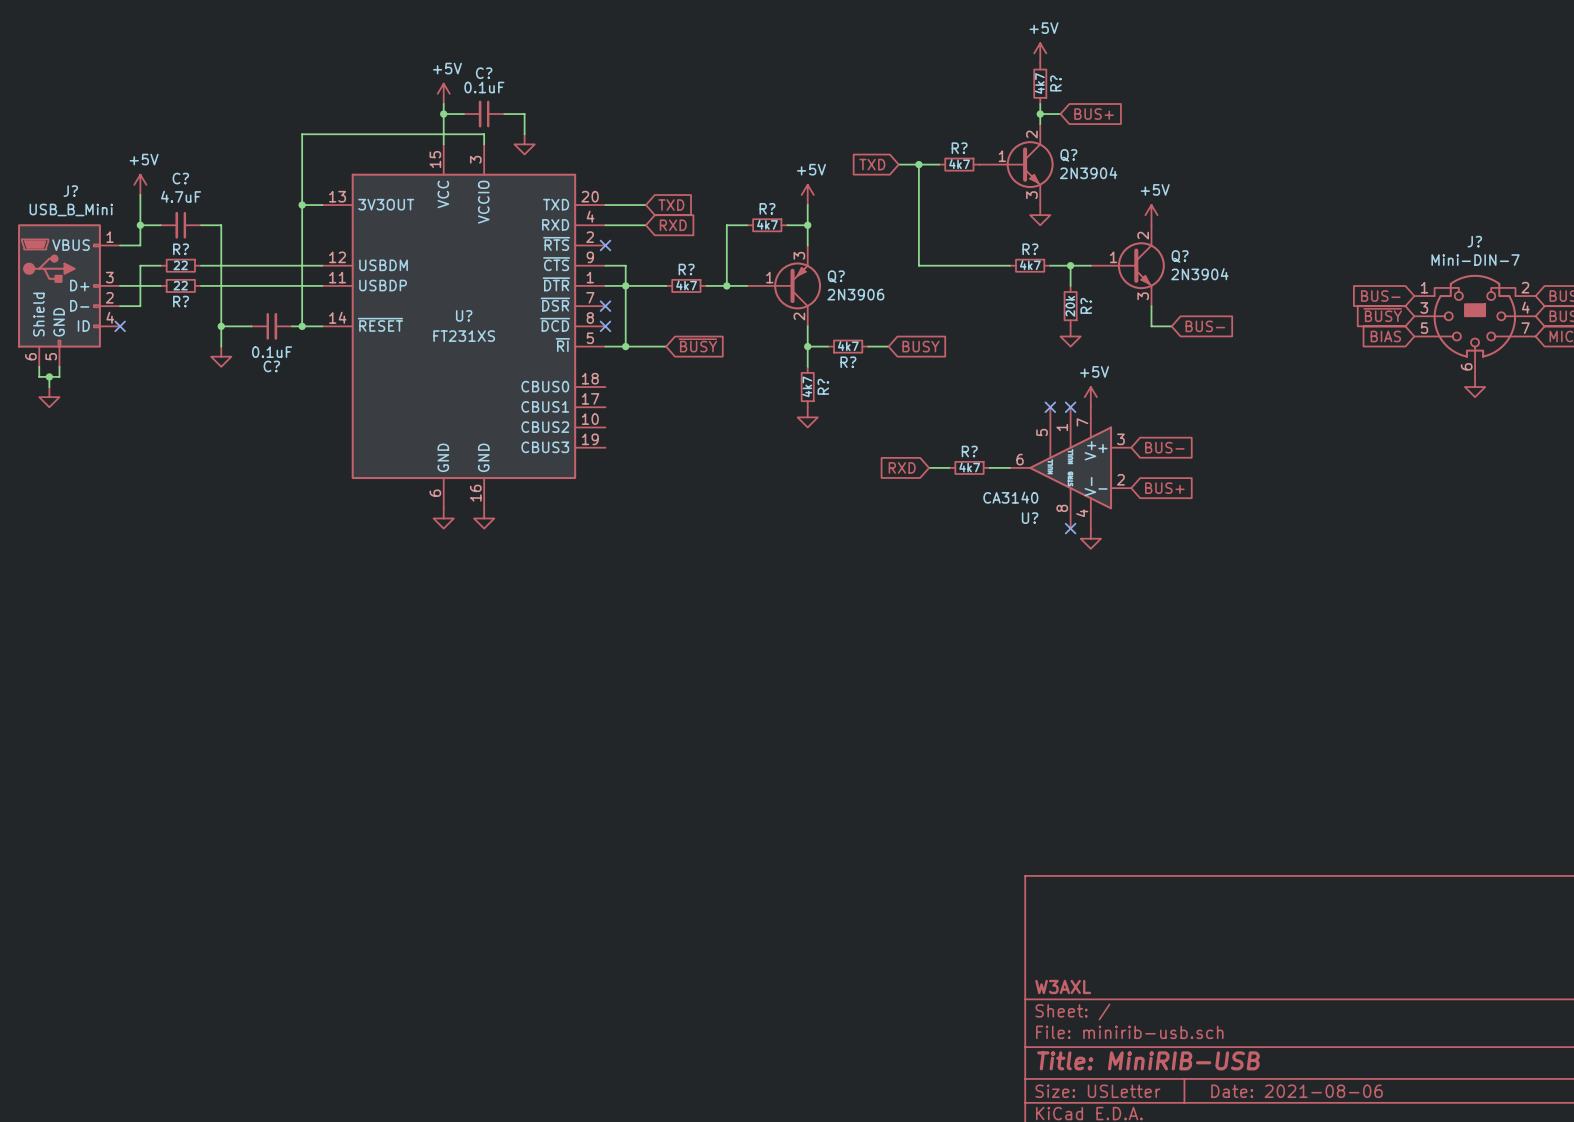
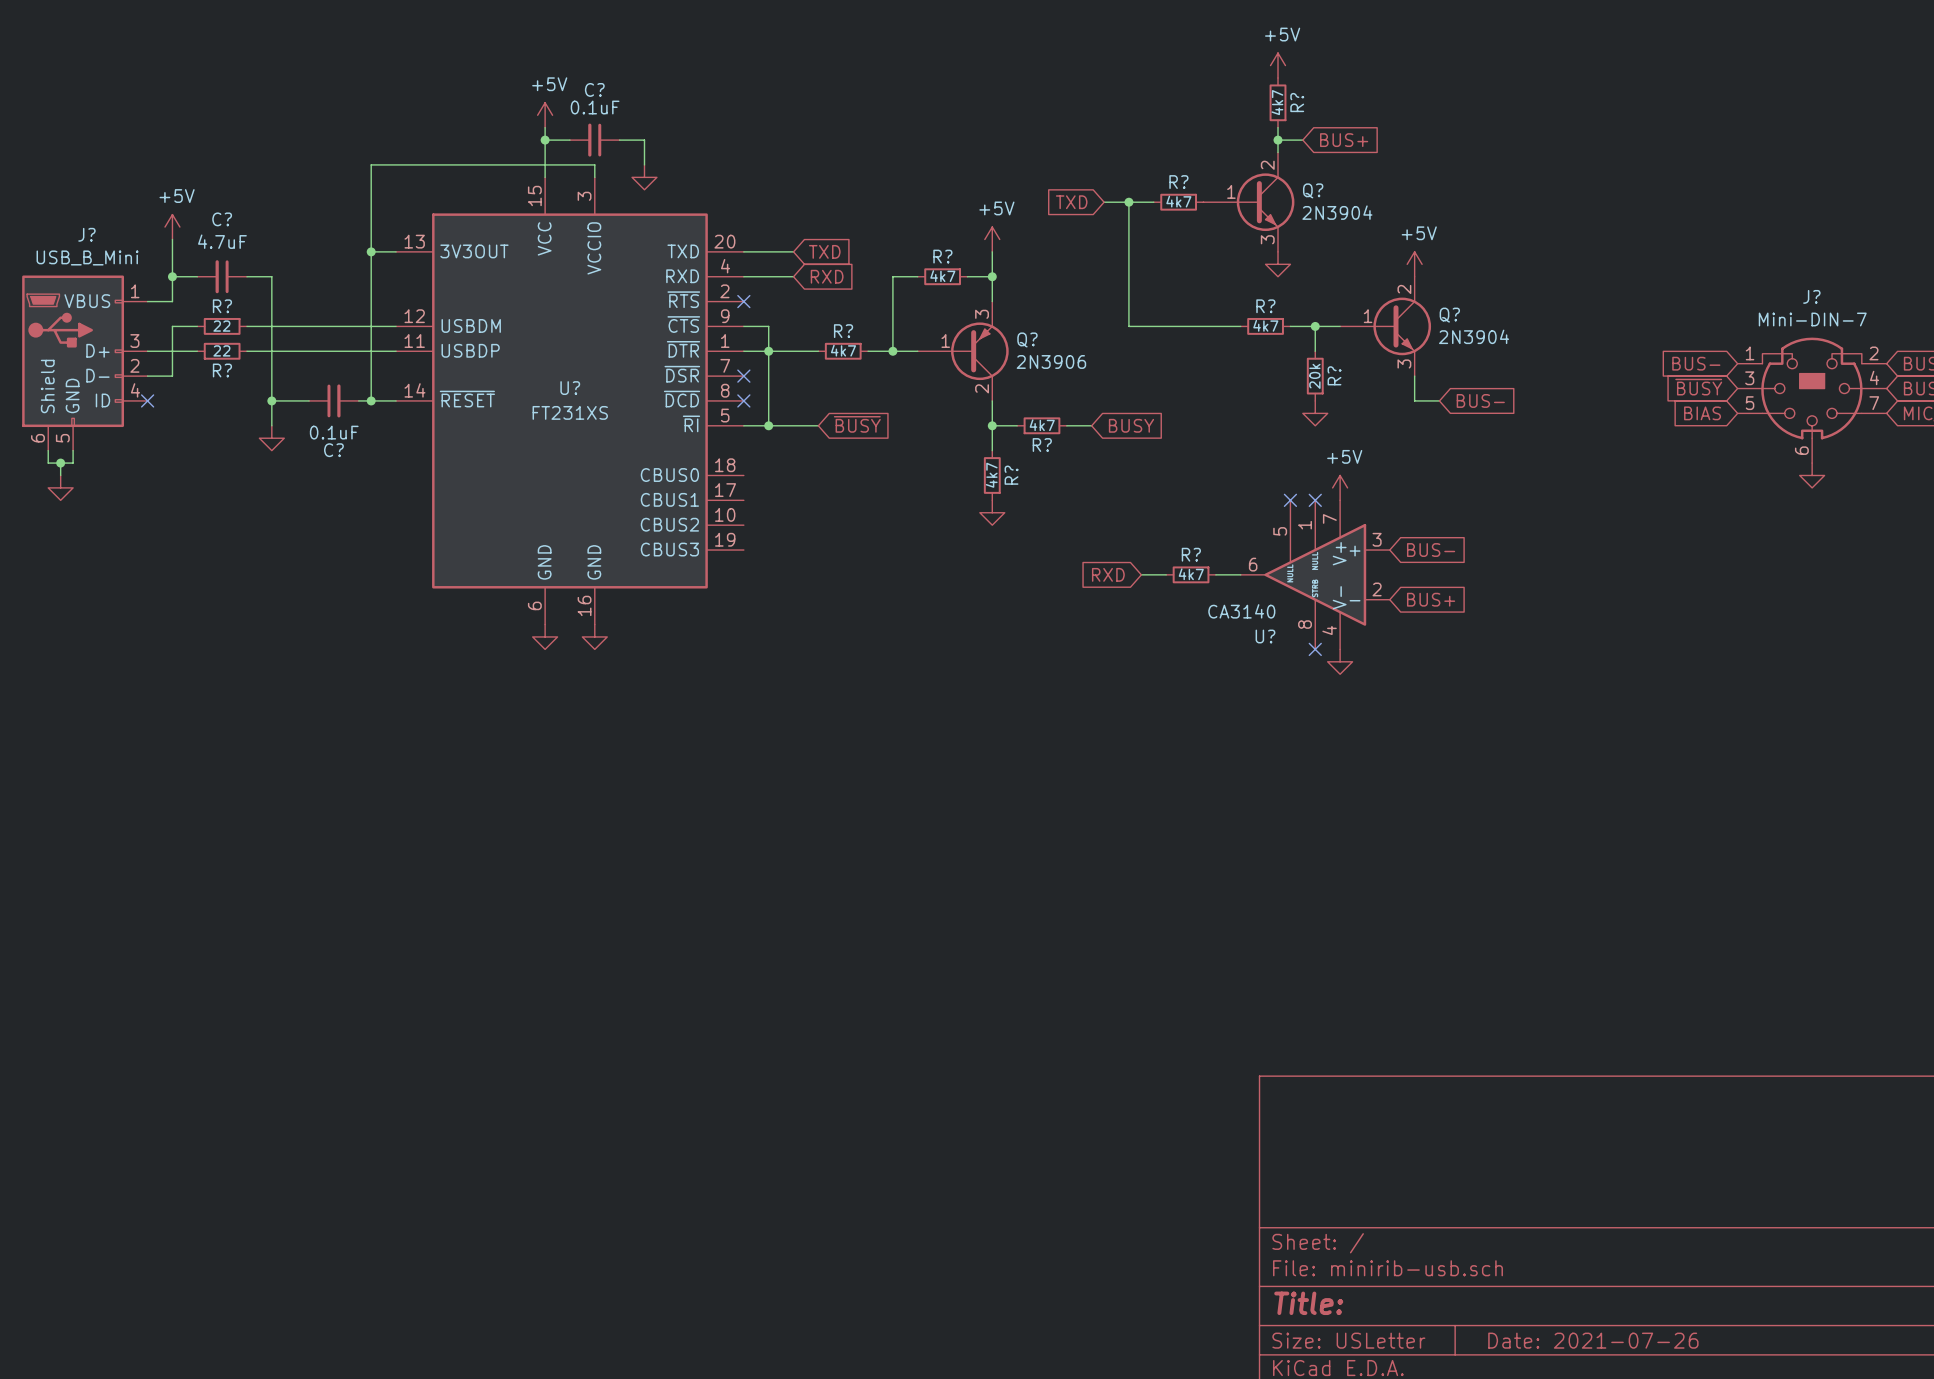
title block: W3AXL (1063, 986) -> none
title block: Title: MiniRIB-USB (1148, 1060) -> Title: (1308, 1303)
title block: Date: 2021-08-06 (1296, 1091) -> Date: 2021-07-26 (1593, 1340)

